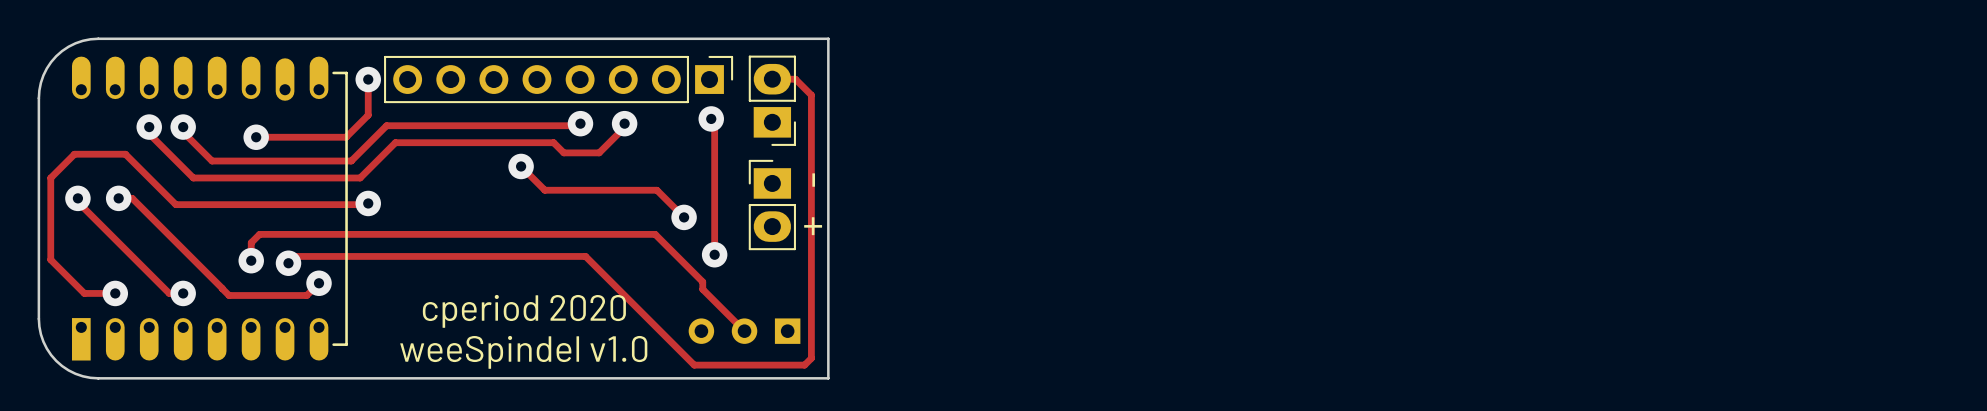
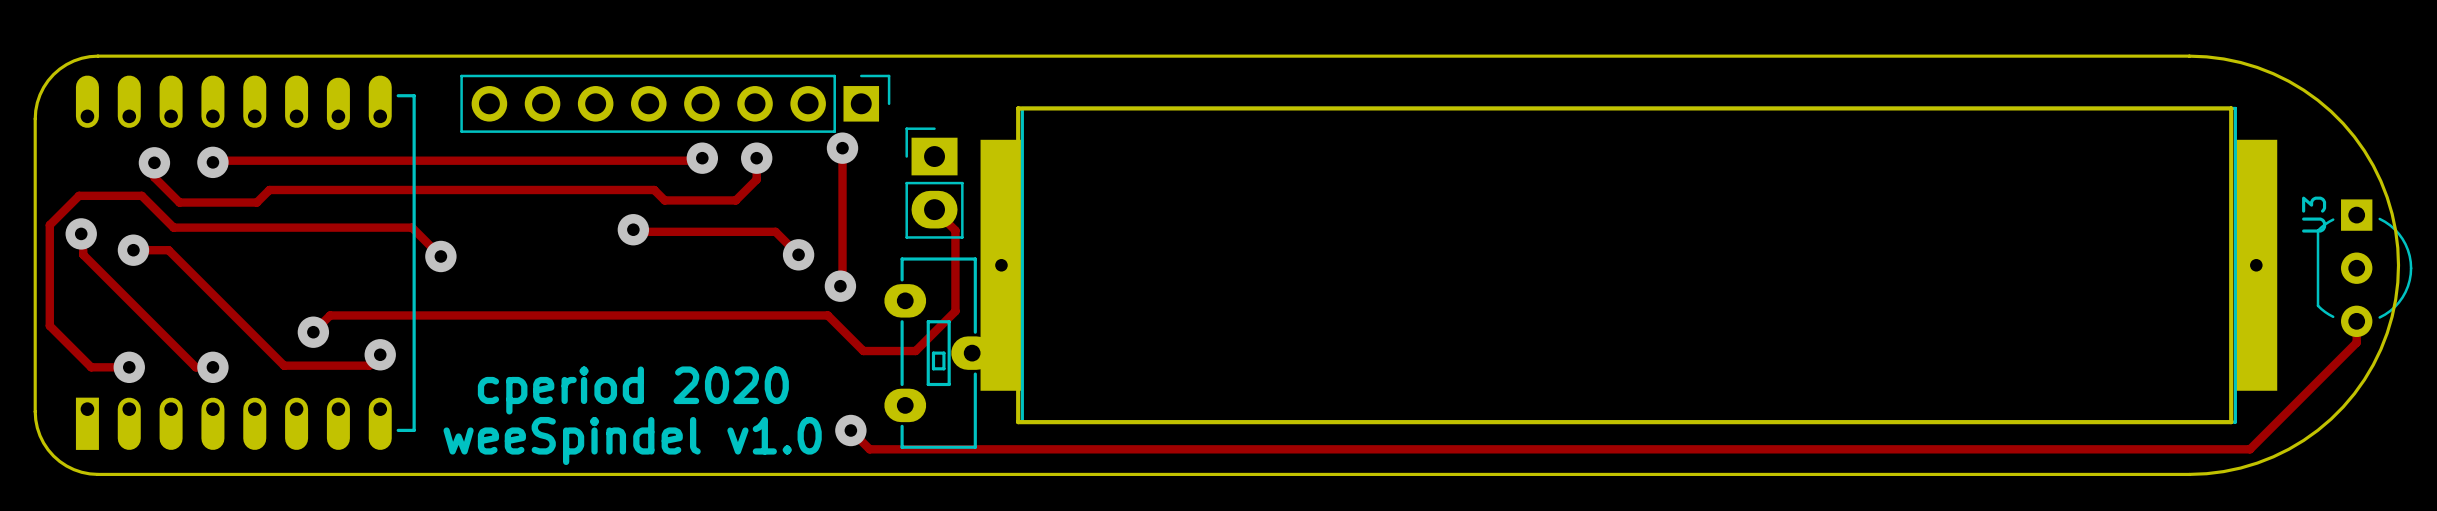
track: (368, 79) (368, 115) (346, 137) (256, 137) -> none
via: (368, 79) -> none
track: (772, 79) (795, 79) (811, 95) (811, 358) (804, 365) (694, 365) (585, 256) (295, 256) (288, 263) -> none
board edge: none -> (1018, 108) (1018, 422) (2231, 422) (2231, 108) (1018, 108)
board edge: (38, 98) (43, 75) (56, 56) (68, 46) (90, 39) (828, 38) (828, 378) (90, 377) (68, 370) (56, 360) (43, 341) (38, 318) -> (35, 126) (35, 110) (39, 94) (53, 74) (73, 60) (97, 56) (2206, 56) (2240, 62) (2273, 73) (2303, 90) (2343, 123) (2373, 165) (2387, 197) (2395, 230) (2398, 265) (2395, 299) (2387, 333) (2373, 364) (2343, 406) (2303, 440) (2273, 456) (2240, 468) (2206, 473) (97, 474) (73, 469) (59, 461) (48, 449) (37, 427) (35, 398)
part: (772, 100) -> none
track: none -> (842, 148) (842, 284) (840, 286)
track: (711, 118) (714, 122) (714, 254) -> none
via position: (711, 118) -> (842, 148)
track: (386, 125) (351, 161) (212, 161) (183, 132) (183, 127) -> (463, 160) (214, 160) (212, 162)
track: (149, 127) (149, 133) (193, 178) (360, 178) (395, 142) (553, 142) (563, 152) (599, 152) (624, 127) -> (154, 162) (154, 177) (179, 202) (256, 202) (269, 189) (654, 189) (664, 200) (735, 200) (756, 179) (756, 162)
via position: (149, 127) -> (154, 162)
via: (256, 137) -> none
part: none -> (934, 183)
track: none -> (934, 209) (955, 230) (955, 311) (915, 351) (863, 351) (827, 315) (330, 315) (313, 332)
track: (521, 166) (544, 190) (656, 190) (684, 217) -> none
via position: (521, 166) -> (633, 229)
track: (151, 180) (175, 204) (368, 203) -> (173, 227) (412, 227) (440, 256)
text: - (813, 180) -> none
track: none -> (633, 229) (635, 231) (775, 231) (798, 254)
via position: (77, 198) -> (81, 233)
track: (132, 198) (222, 288) -> (150, 250) (168, 250) (284, 365) (369, 365)
via: none -> (798, 254)
part: (772, 205) -> none
part: none -> (1628, 265)
U3: none -> (2364, 268)
via position: (684, 217) -> (840, 286)
text: + (813, 226) -> none
via: (714, 254) -> none
track: none -> (2356, 321) (2356, 342) (2250, 449) (869, 449) (850, 430)
track: (251, 260) (251, 242) (259, 234) (655, 234) (702, 281) (702, 289) (744, 331) -> none
via: (251, 260) -> none
via: (288, 263) -> none
via: none -> (313, 332)
part: none -> (938, 353)
track: (222, 288) (229, 295) (306, 295) (310, 292) -> none
part: (744, 331) -> none
via: none -> (850, 430)

